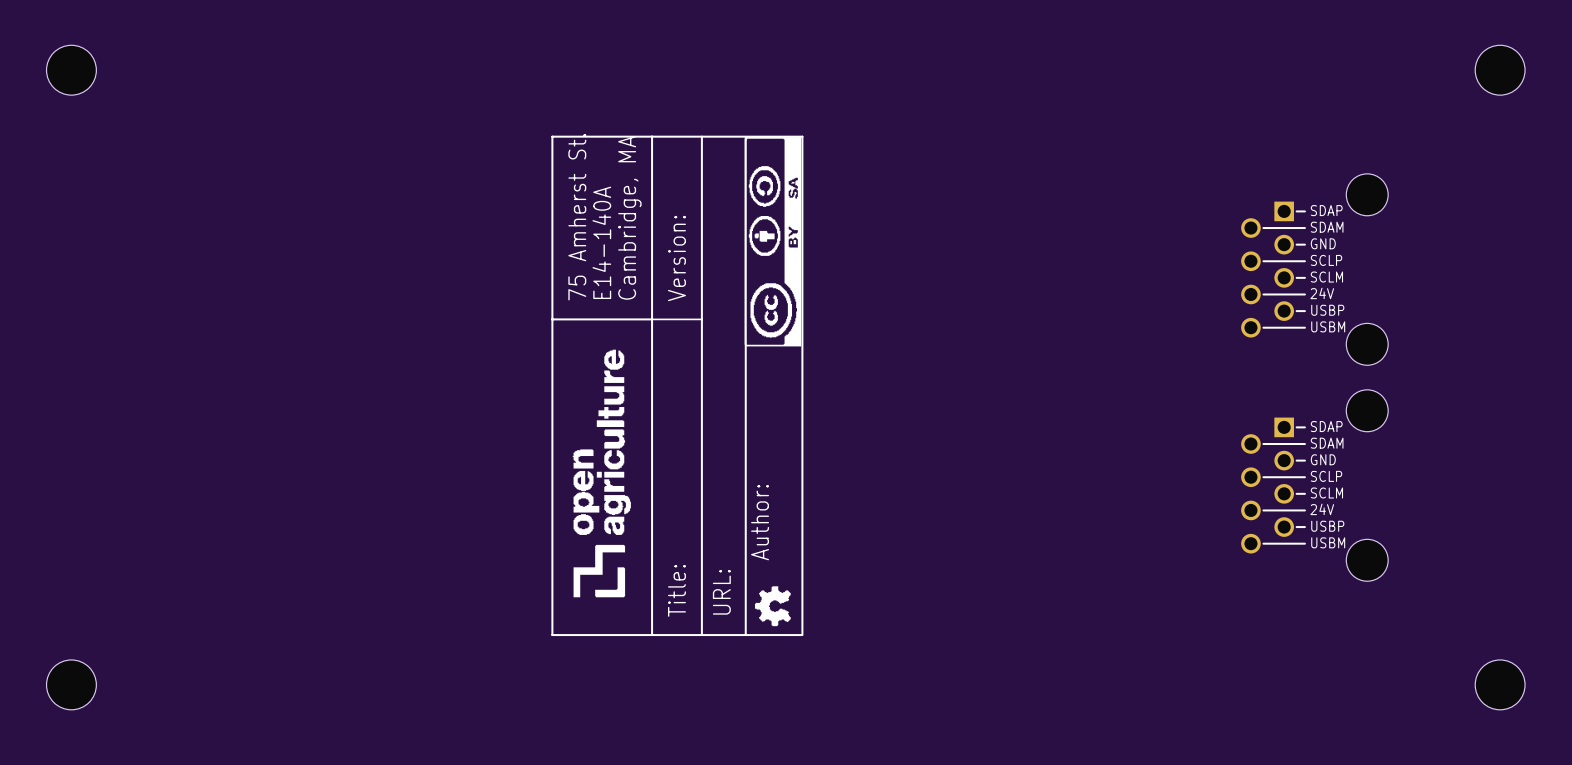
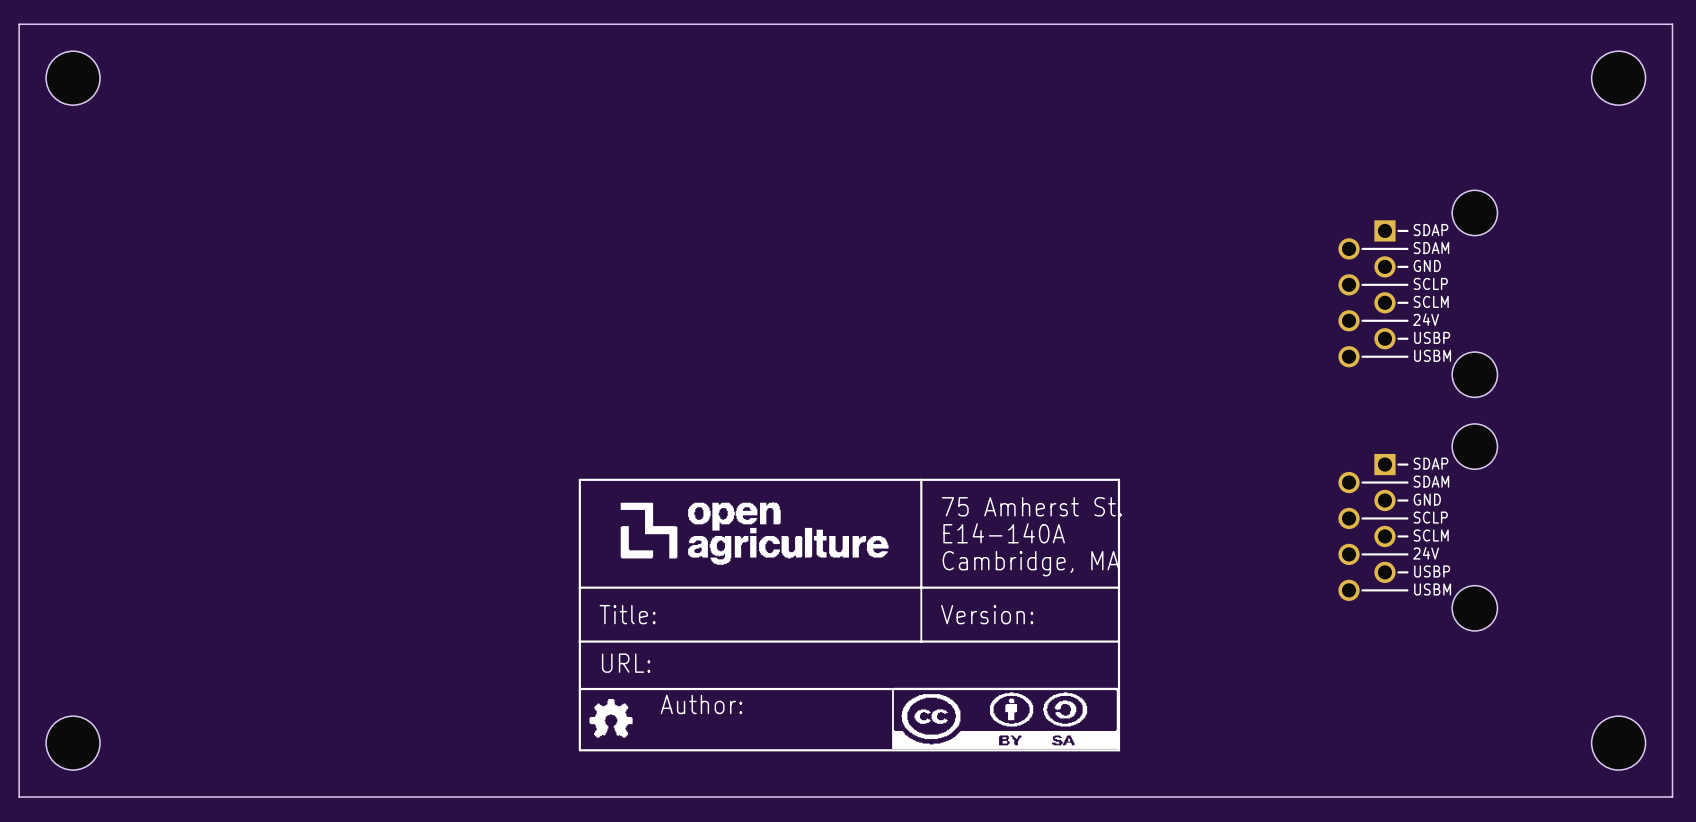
board edge: none -> (1672, 24) (19, 24) (19, 797) (1672, 797) (1672, 24)
drawing: [551, 135, 804, 637] -> none
drawing: none -> [578, 478, 1121, 752]

